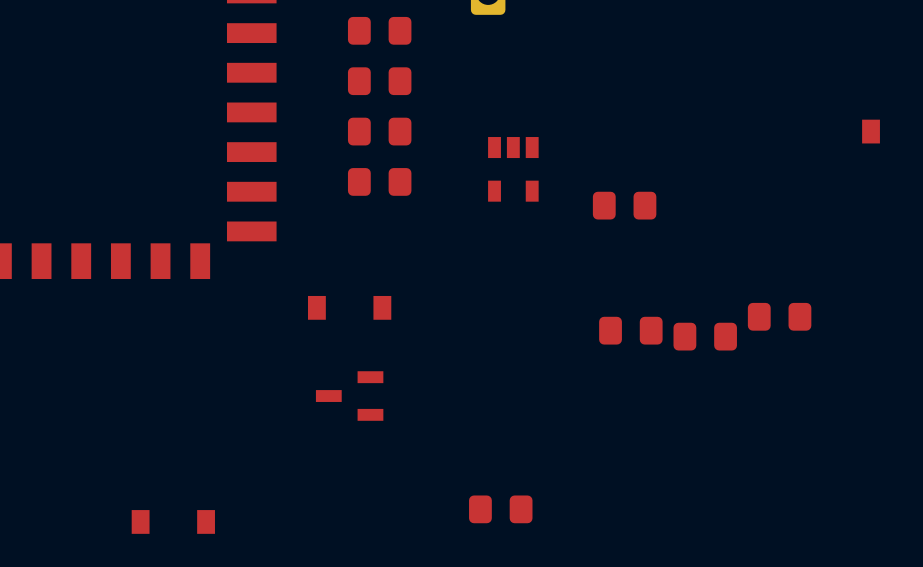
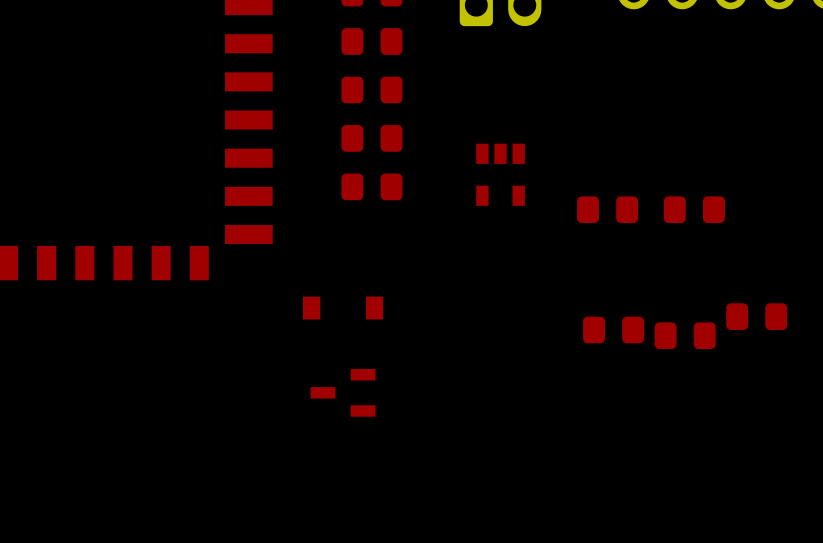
part position: (500, 509) -> (694, 209)
part: (173, 521) -> none

